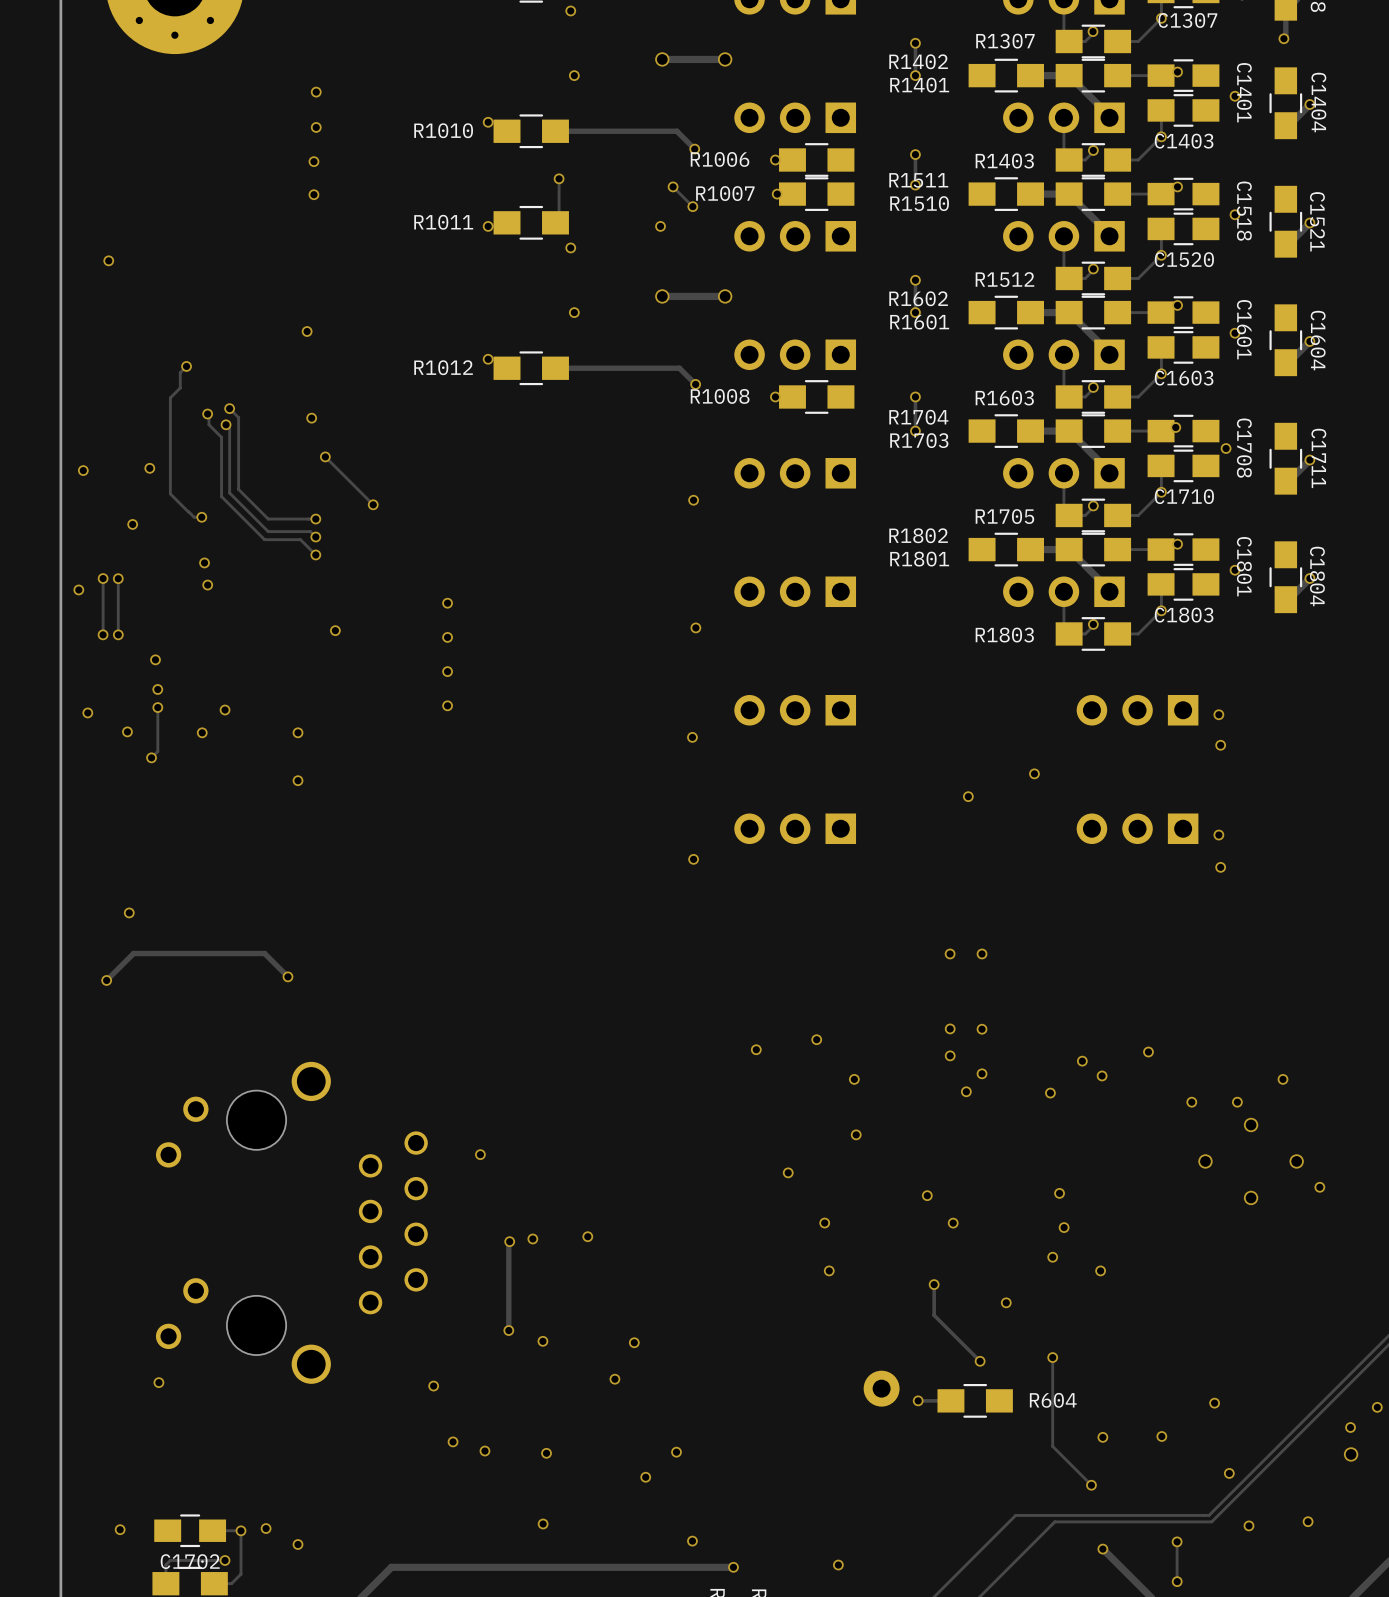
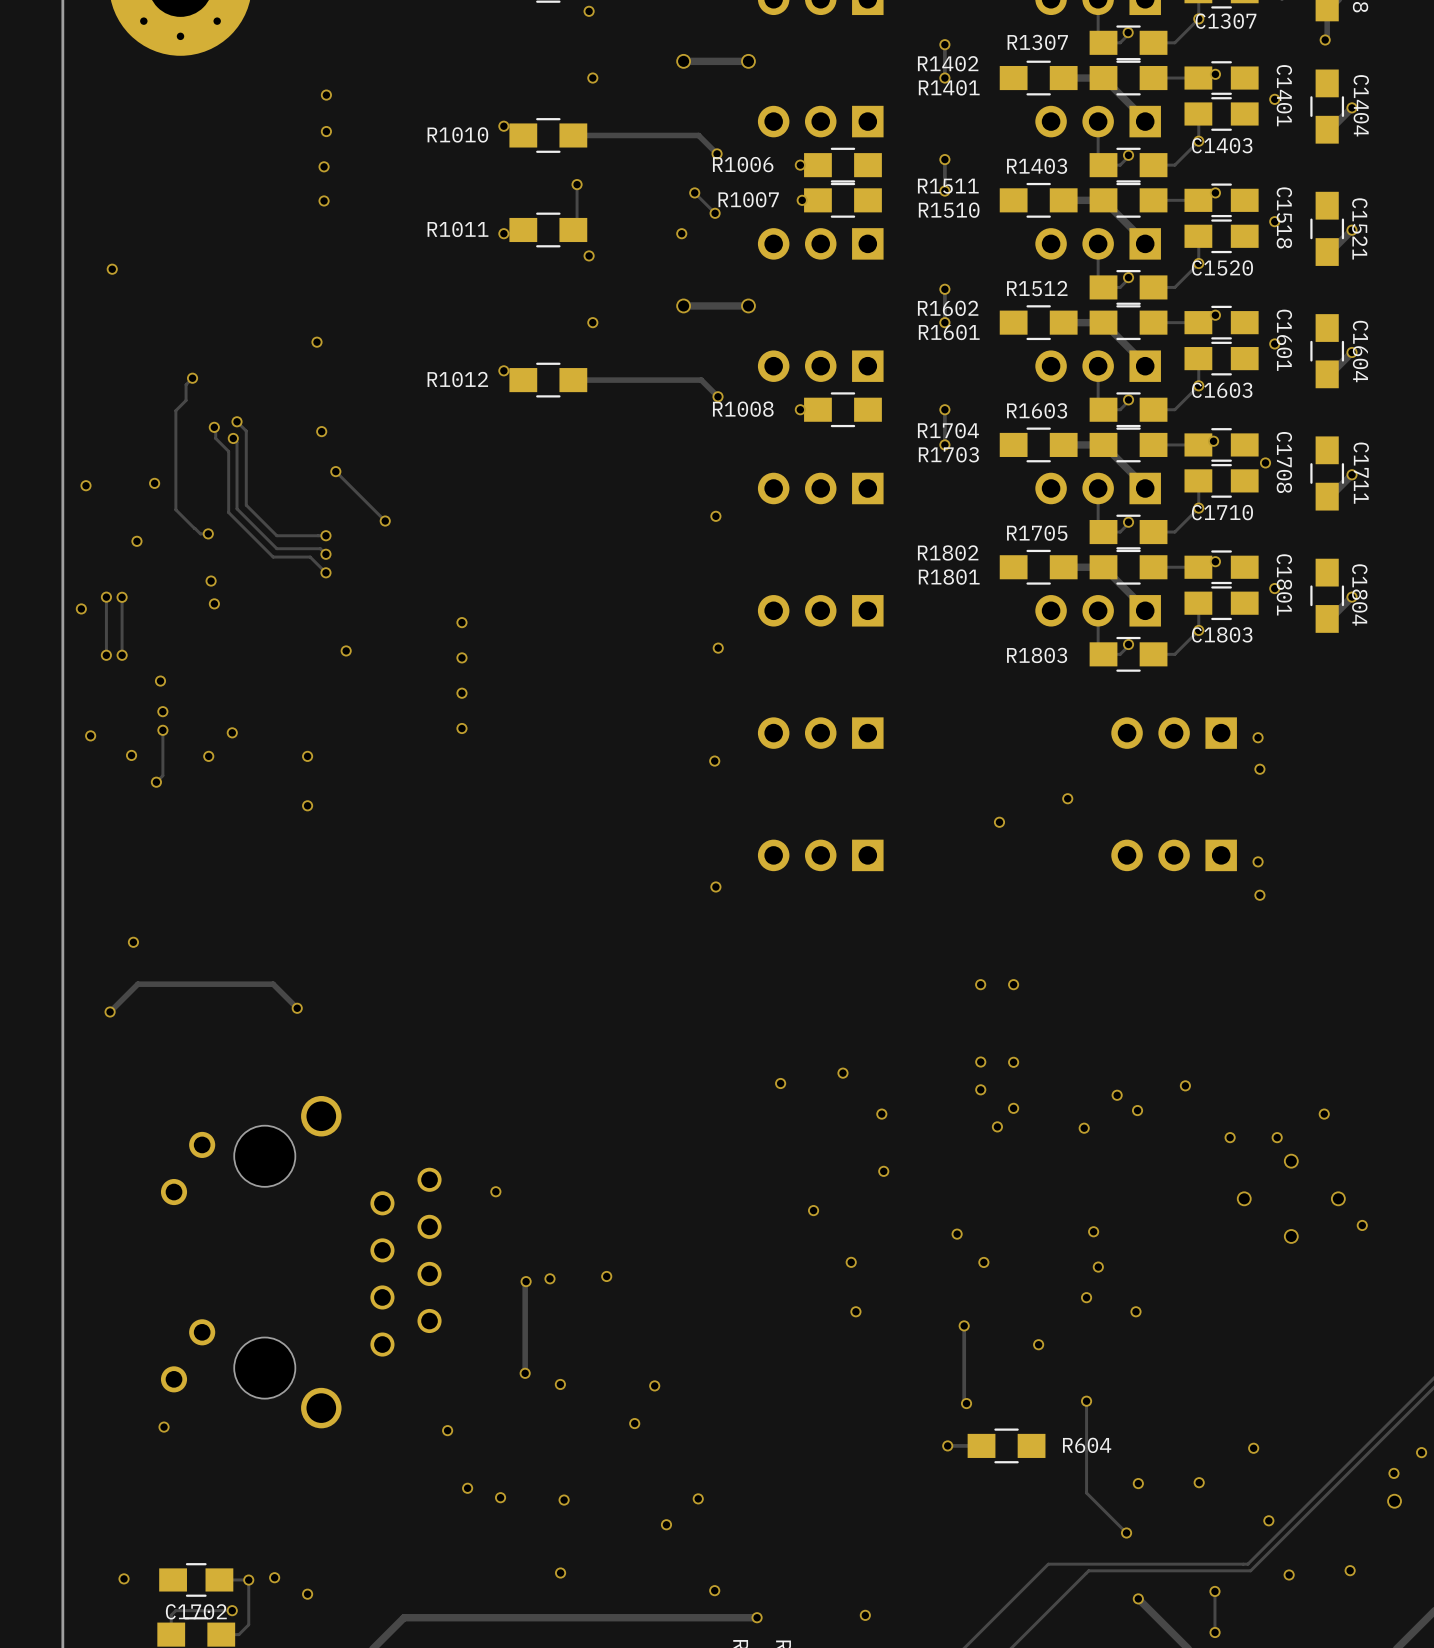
track: (934, 1315) (980, 1361) -> (964, 1357) (964, 1401) (966, 1403)
via position: (980, 1361) -> (966, 1403)
part: (881, 1388) -> none

